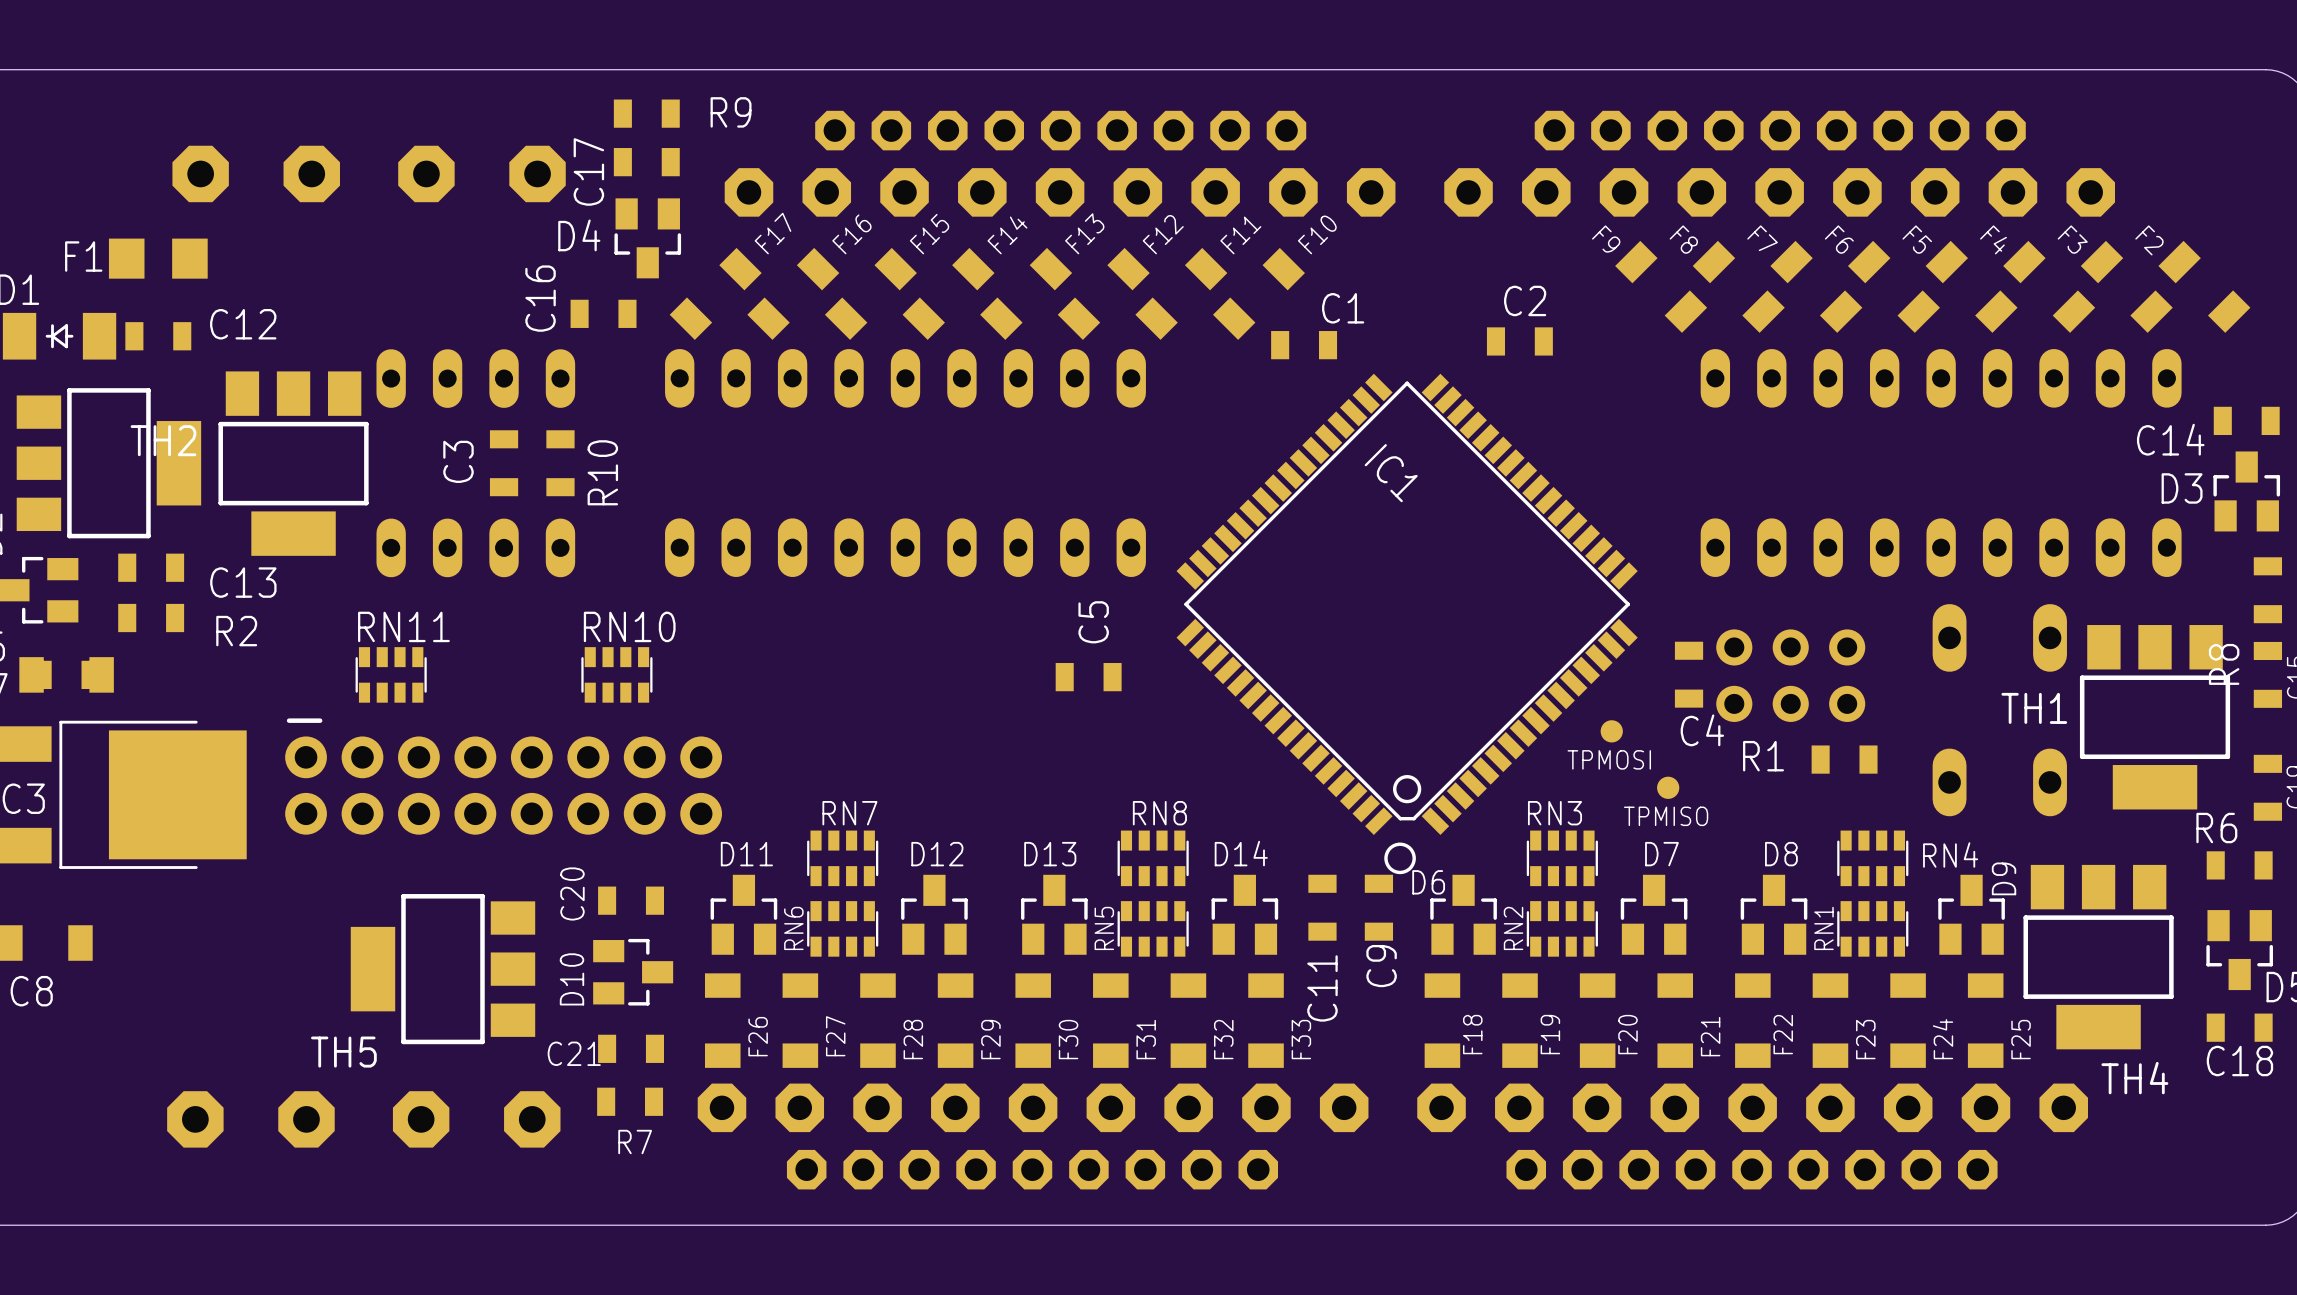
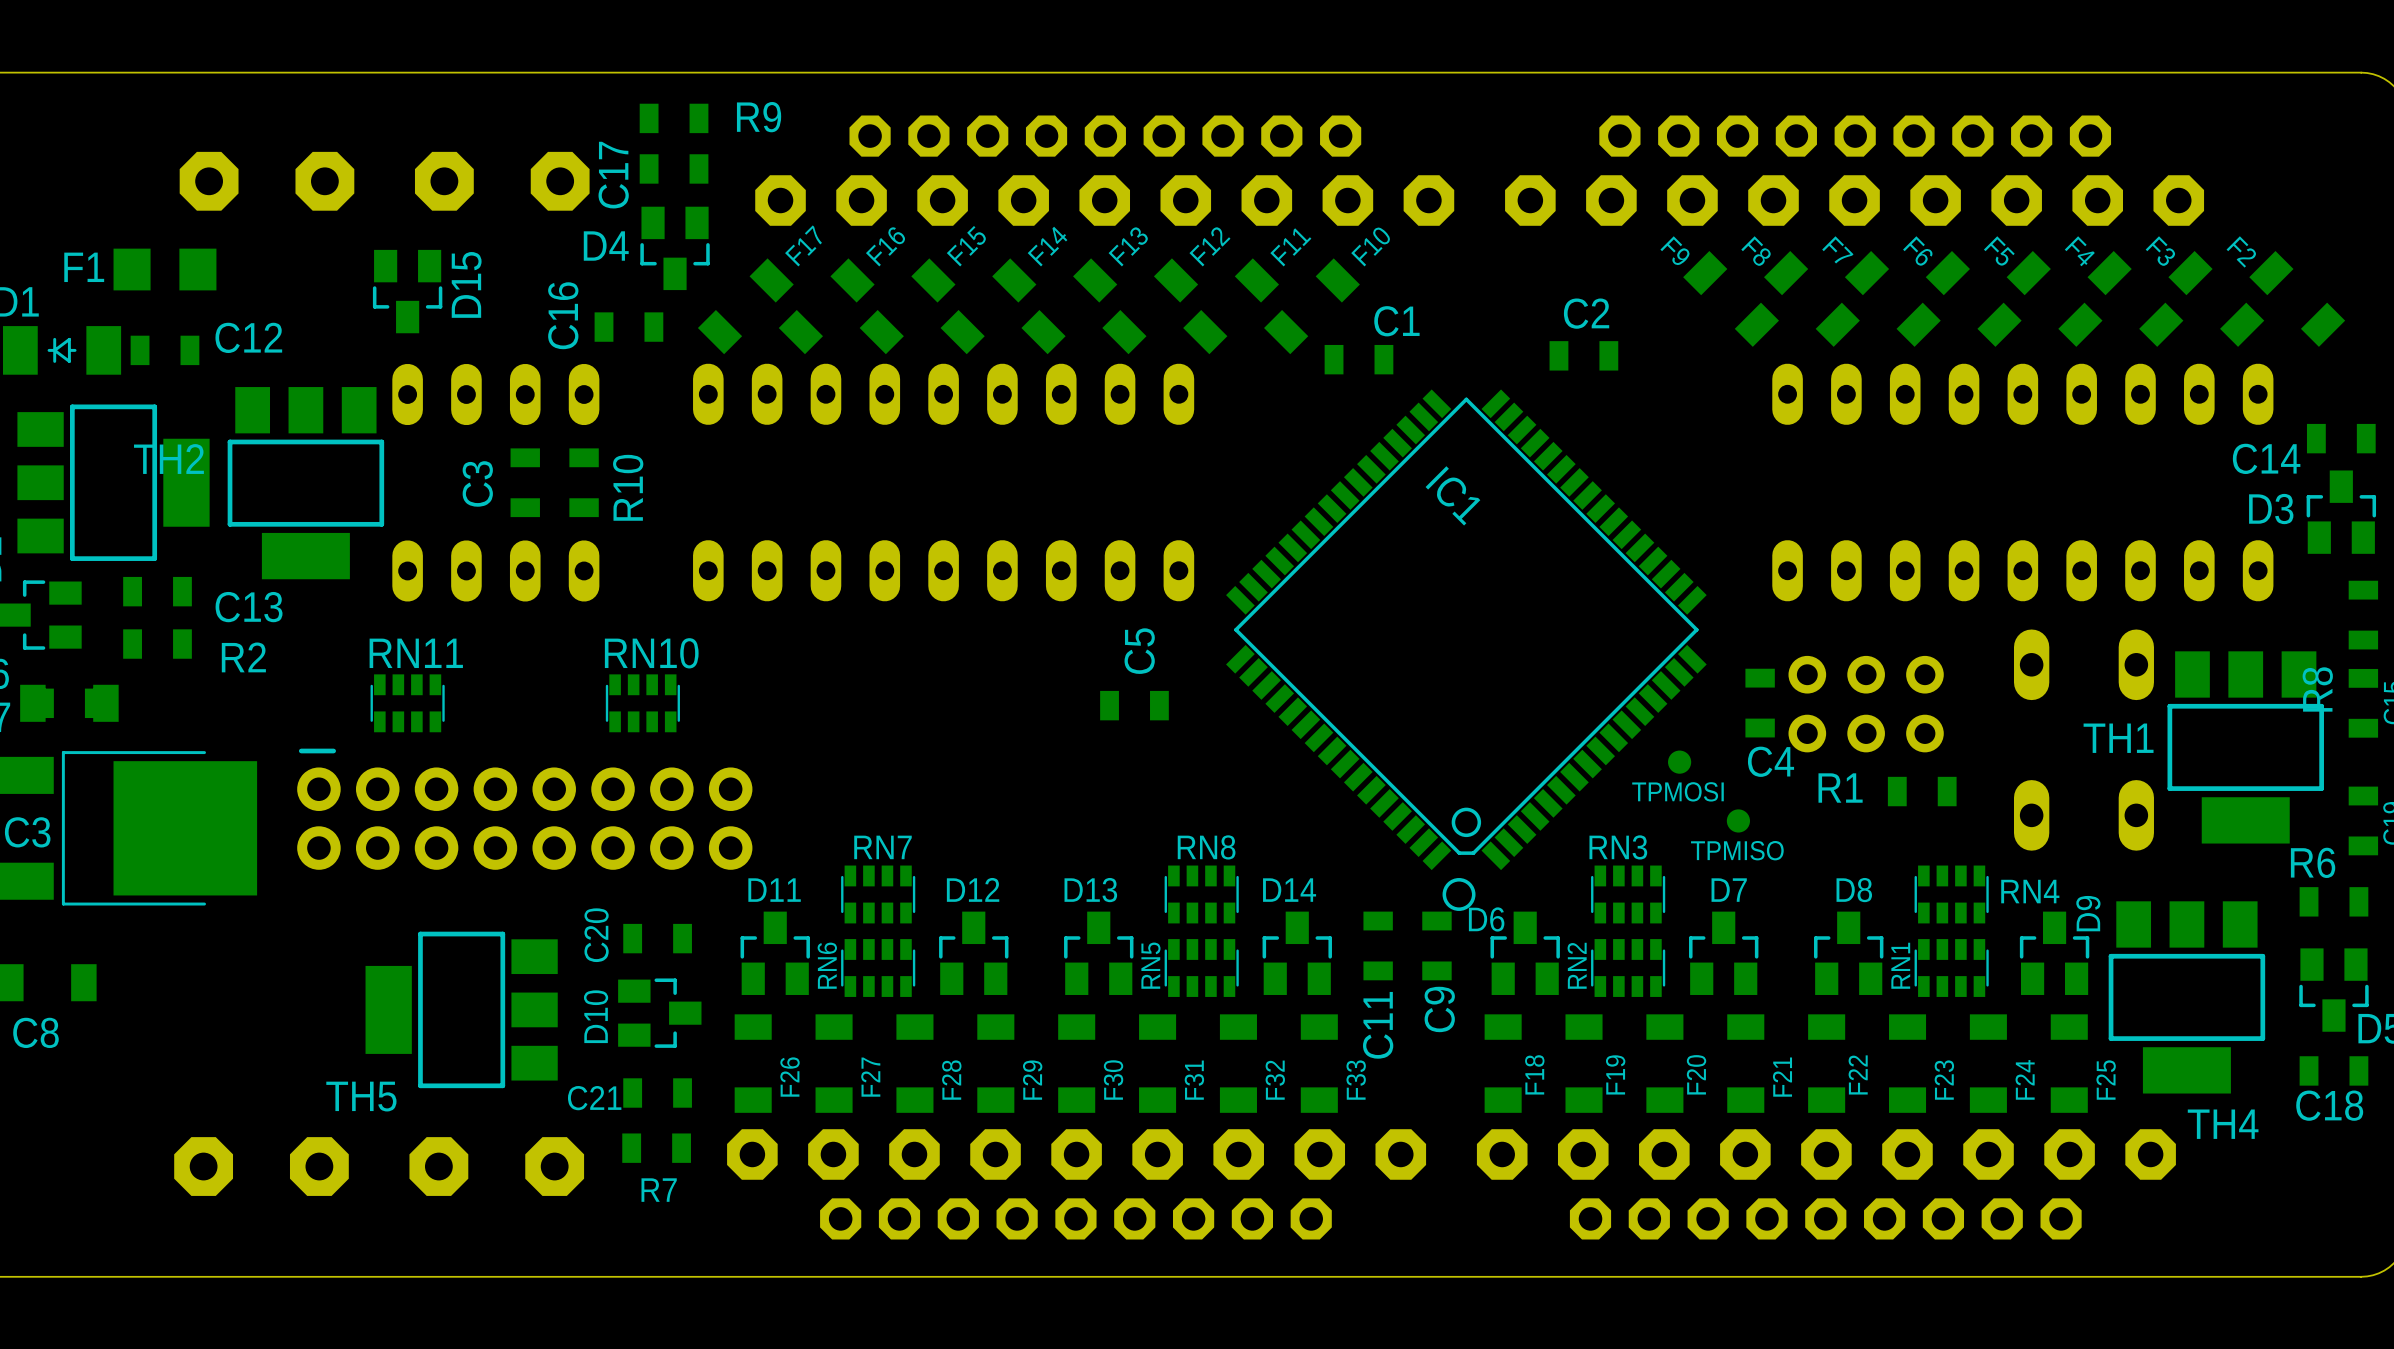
D15: none -> (407, 291)

